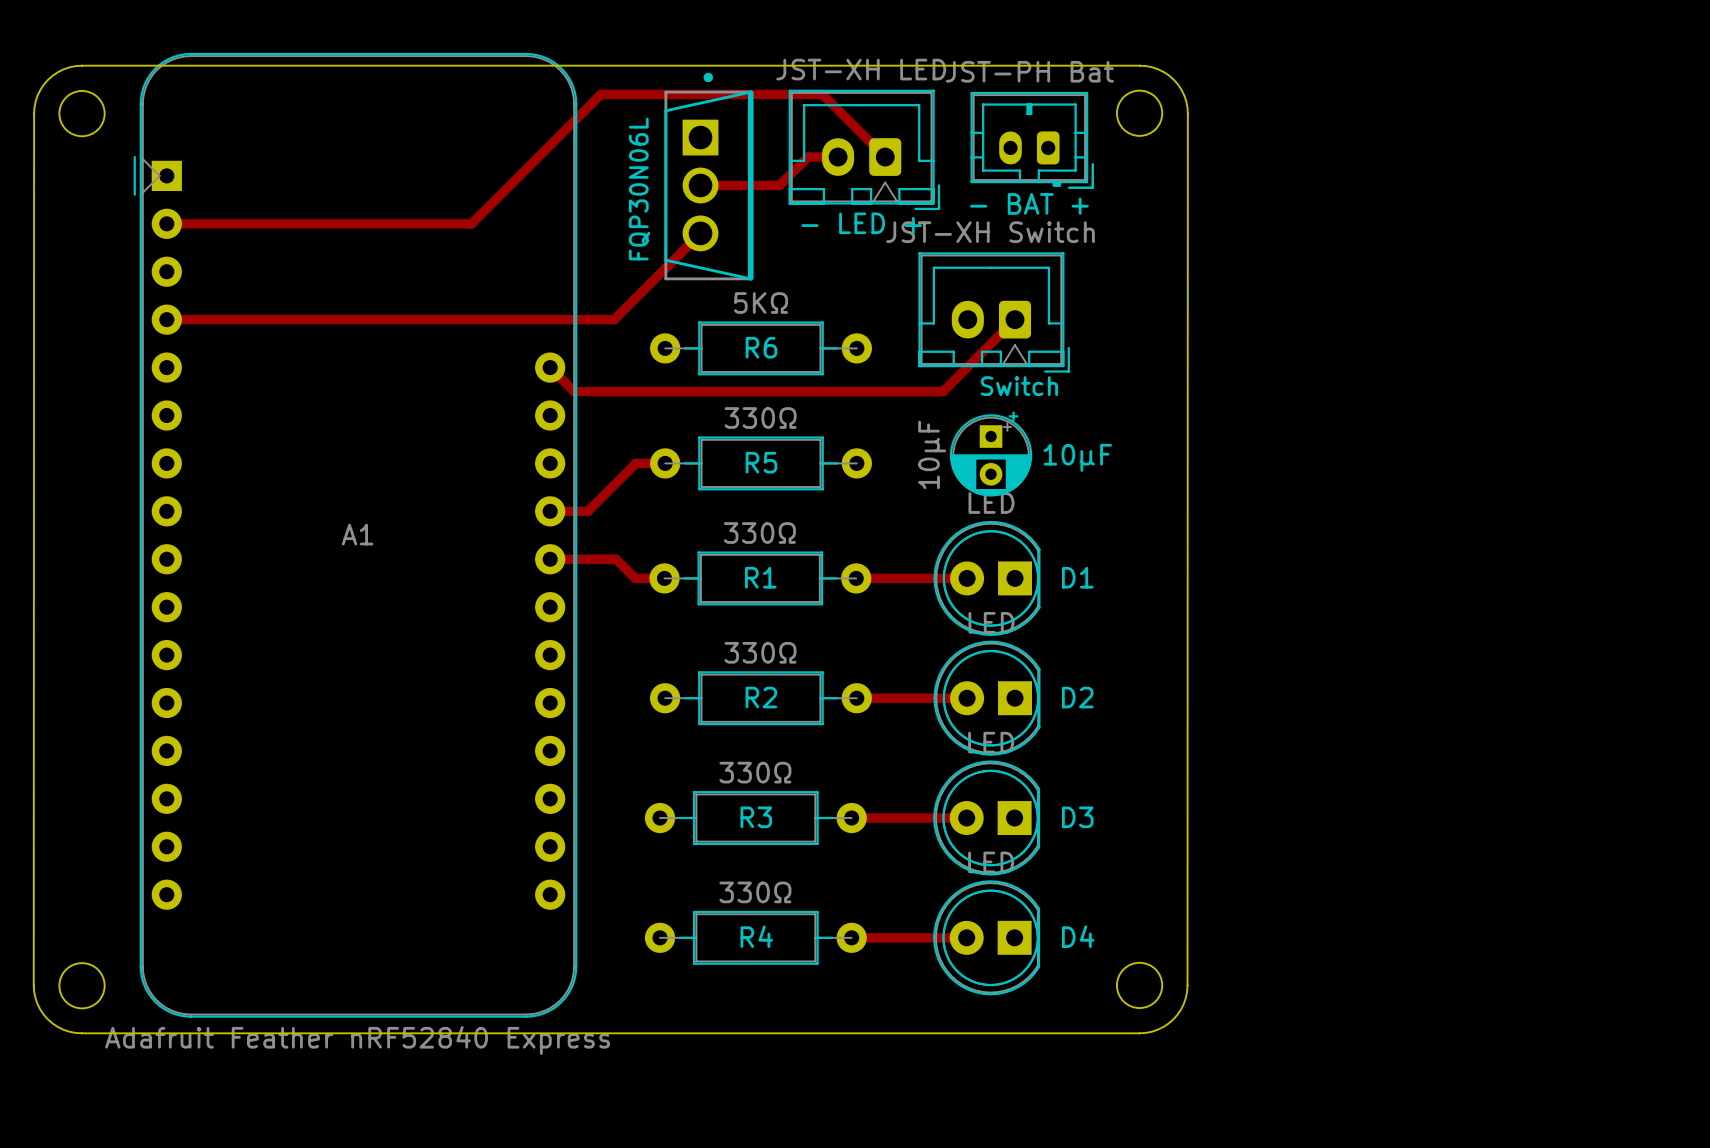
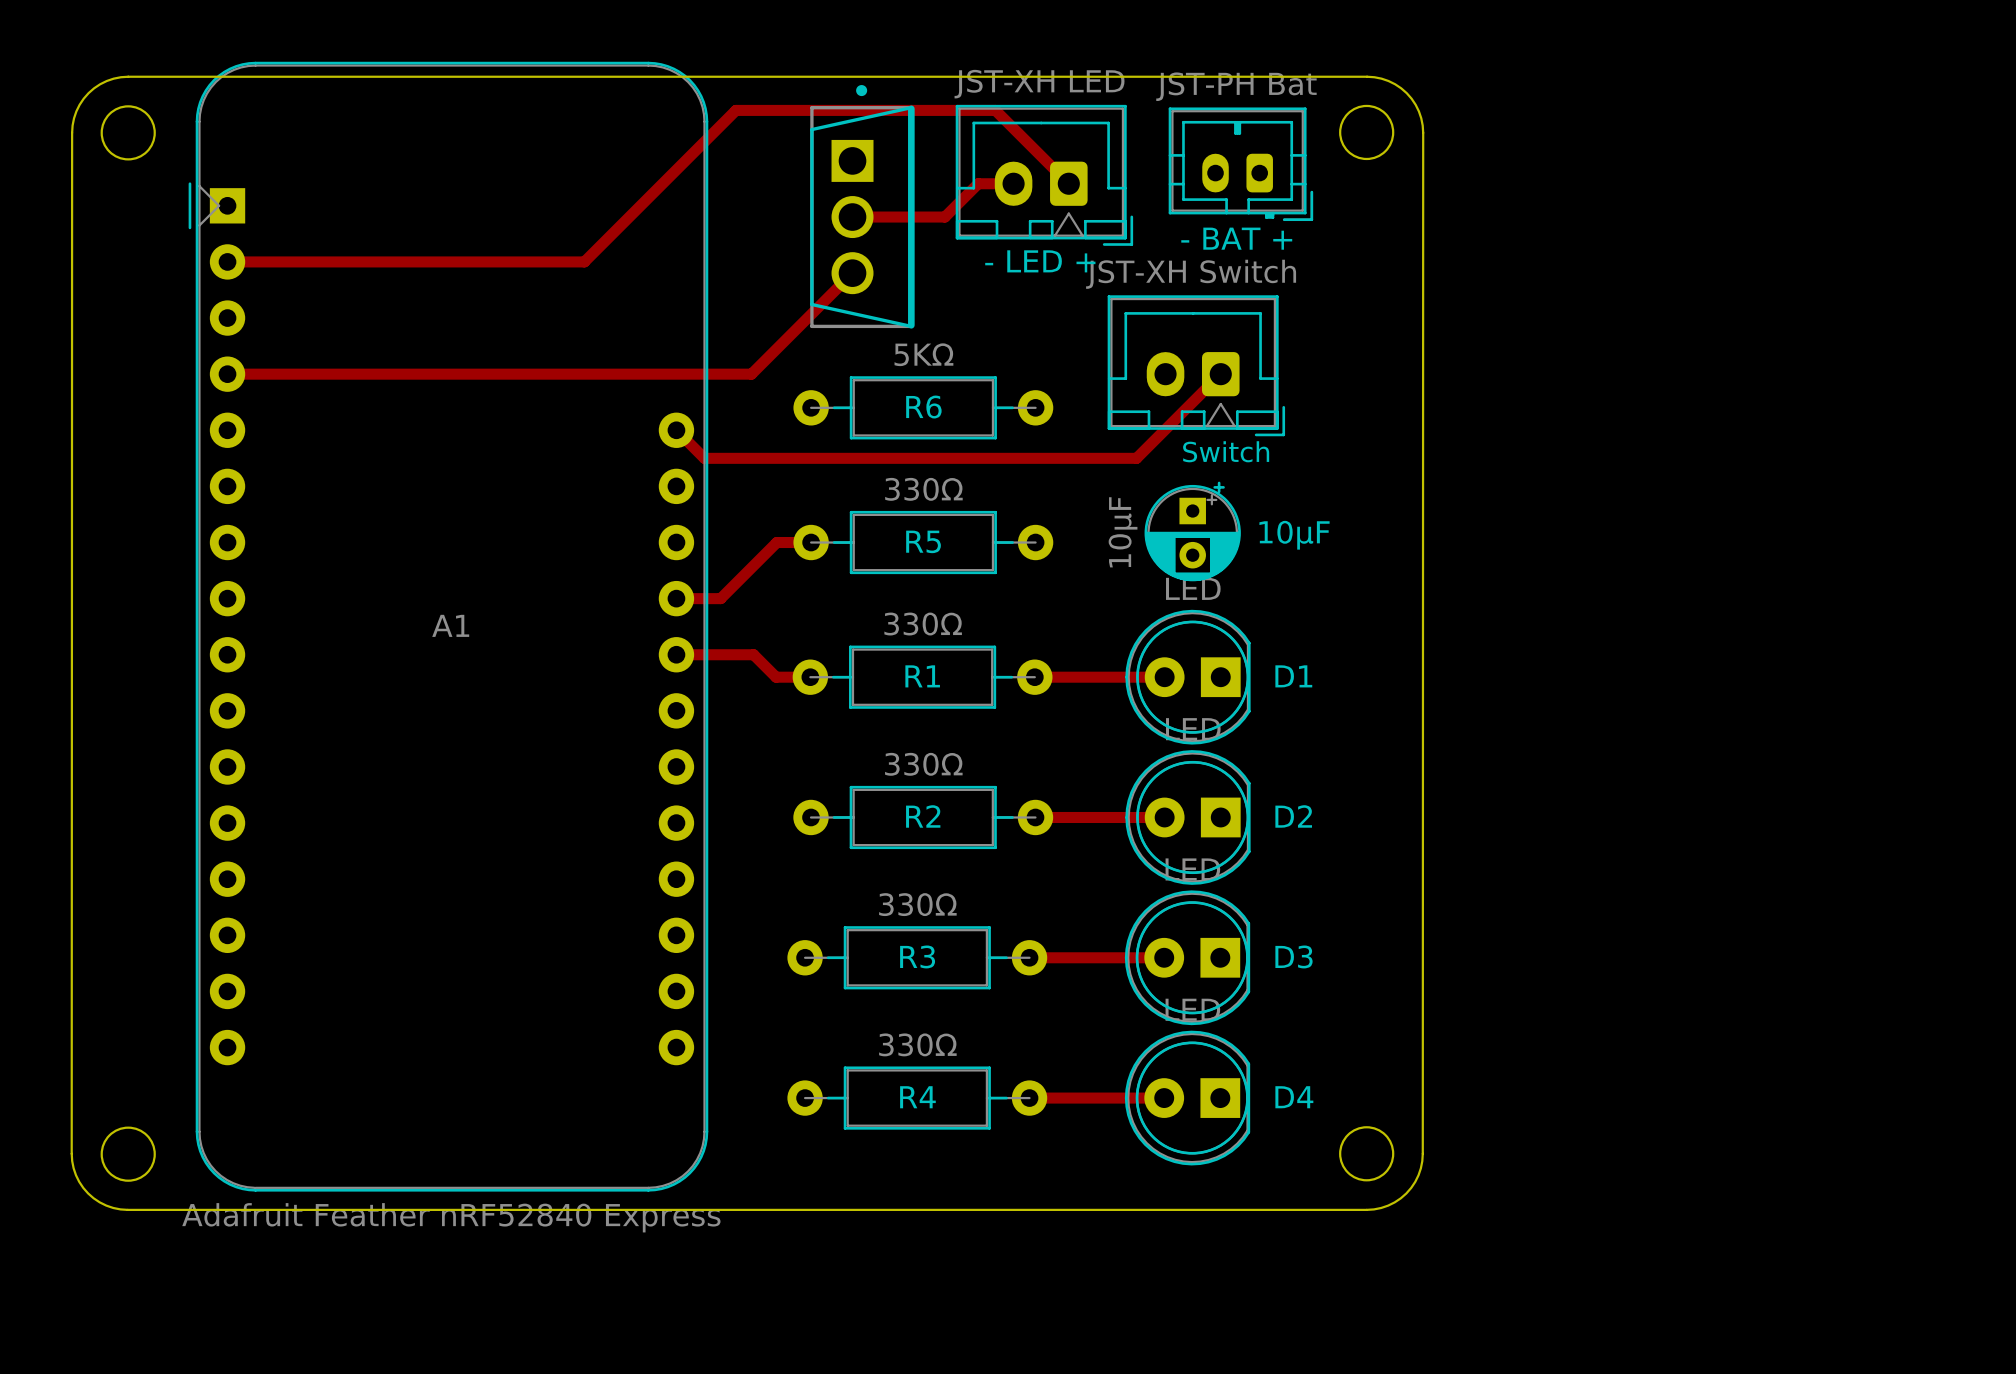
part value: FQP30N06L (639, 189) -> none

